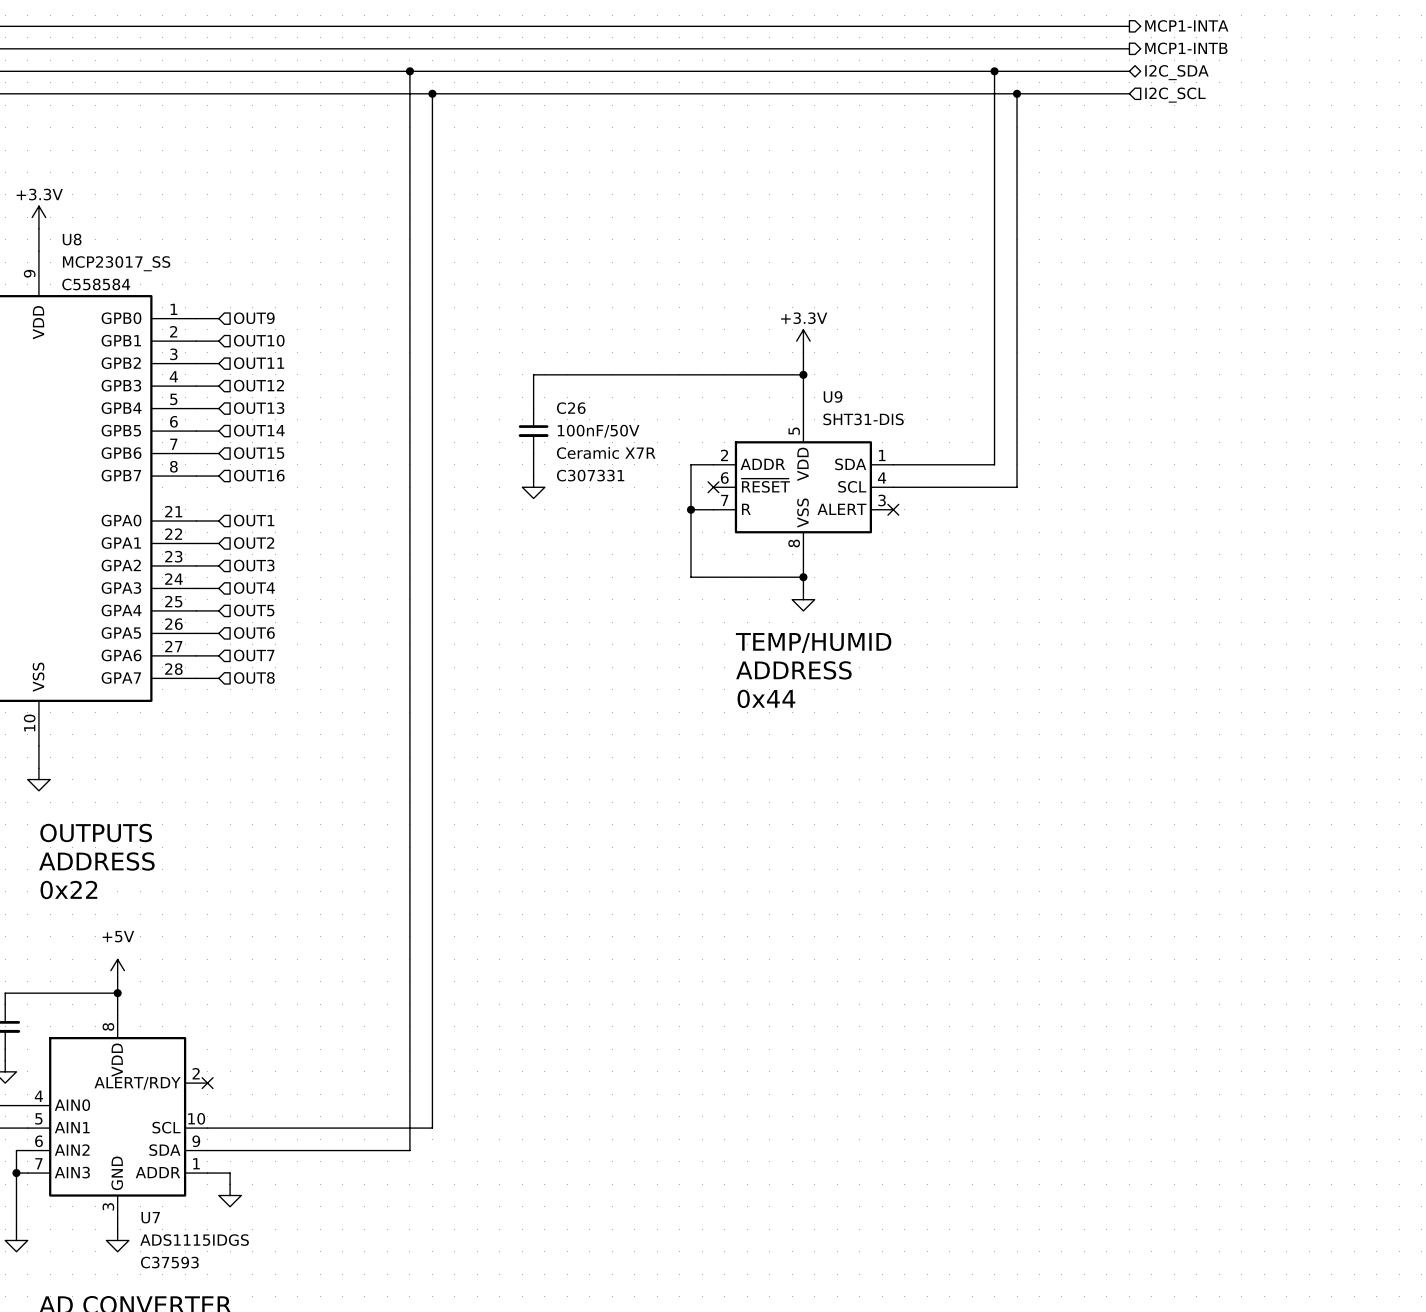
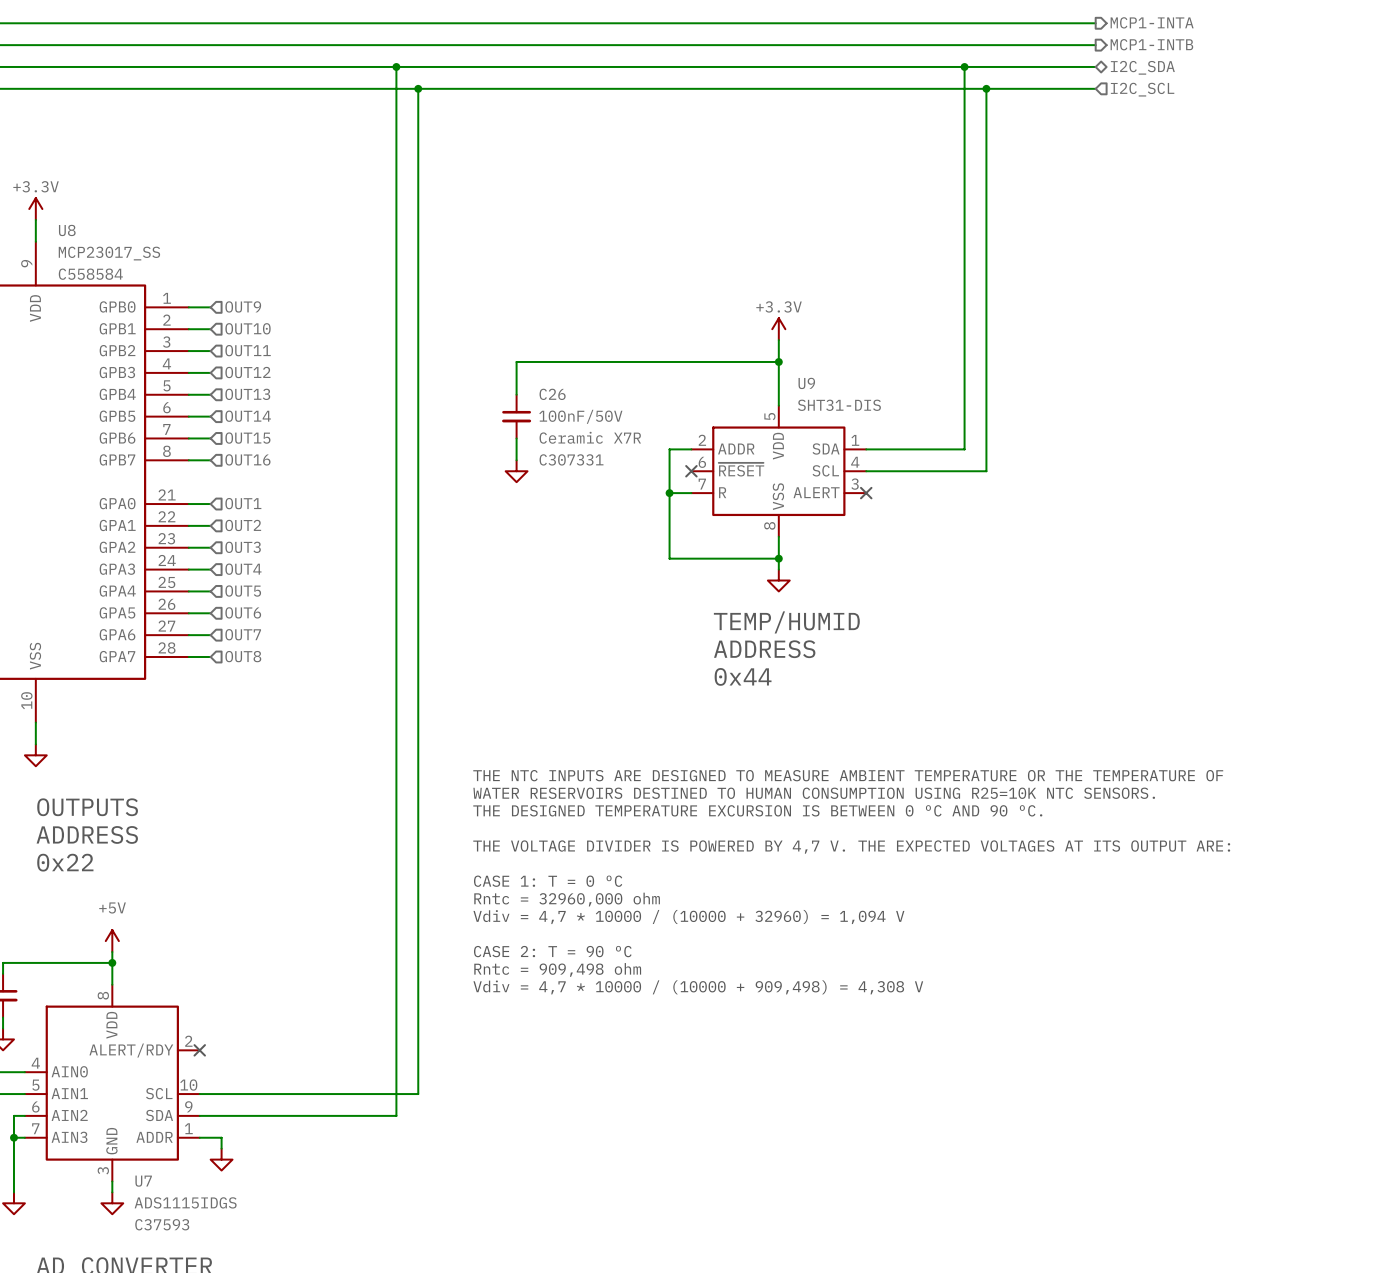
text: none -> THE NTC INPUTS ARE DESIGNED TO MEASURE AMBIENT TEMPERATURE OR THE TEMPERATURE OF (848, 775)
text: none -> WATER RESERVOIRS DESTINED TO HUMAN CONSUMPTION USING R25=10K NTC SENSORS. (814, 793)
text: none -> THE DESIGNED TEMPERATURE EXCURSION IS BETWEEN 0 ºC AND 90 ºC. (757, 810)
text: none -> THE VOLTAGE DIVIDER IS POWERED BY 4,7 V. THE EXPECTED VOLTAGES AT ITS OUTPUT ARE: (851, 847)
text: none -> CASE 1: T = 0 ºC (548, 881)
text: none -> Rntc = 32960,000 ohm (567, 899)
text: none -> Vdiv = 4,7 * 10000 / (10000 + 32960) = 1,094 V (688, 917)
text: none -> CASE 2: T = 90 ºC (552, 951)
text: none -> Rntc = 909,498 ohm (557, 969)
text: none -> Vdiv = 4,7 * 10000 / (10000 + 909,498) = 4,308 V (698, 987)

